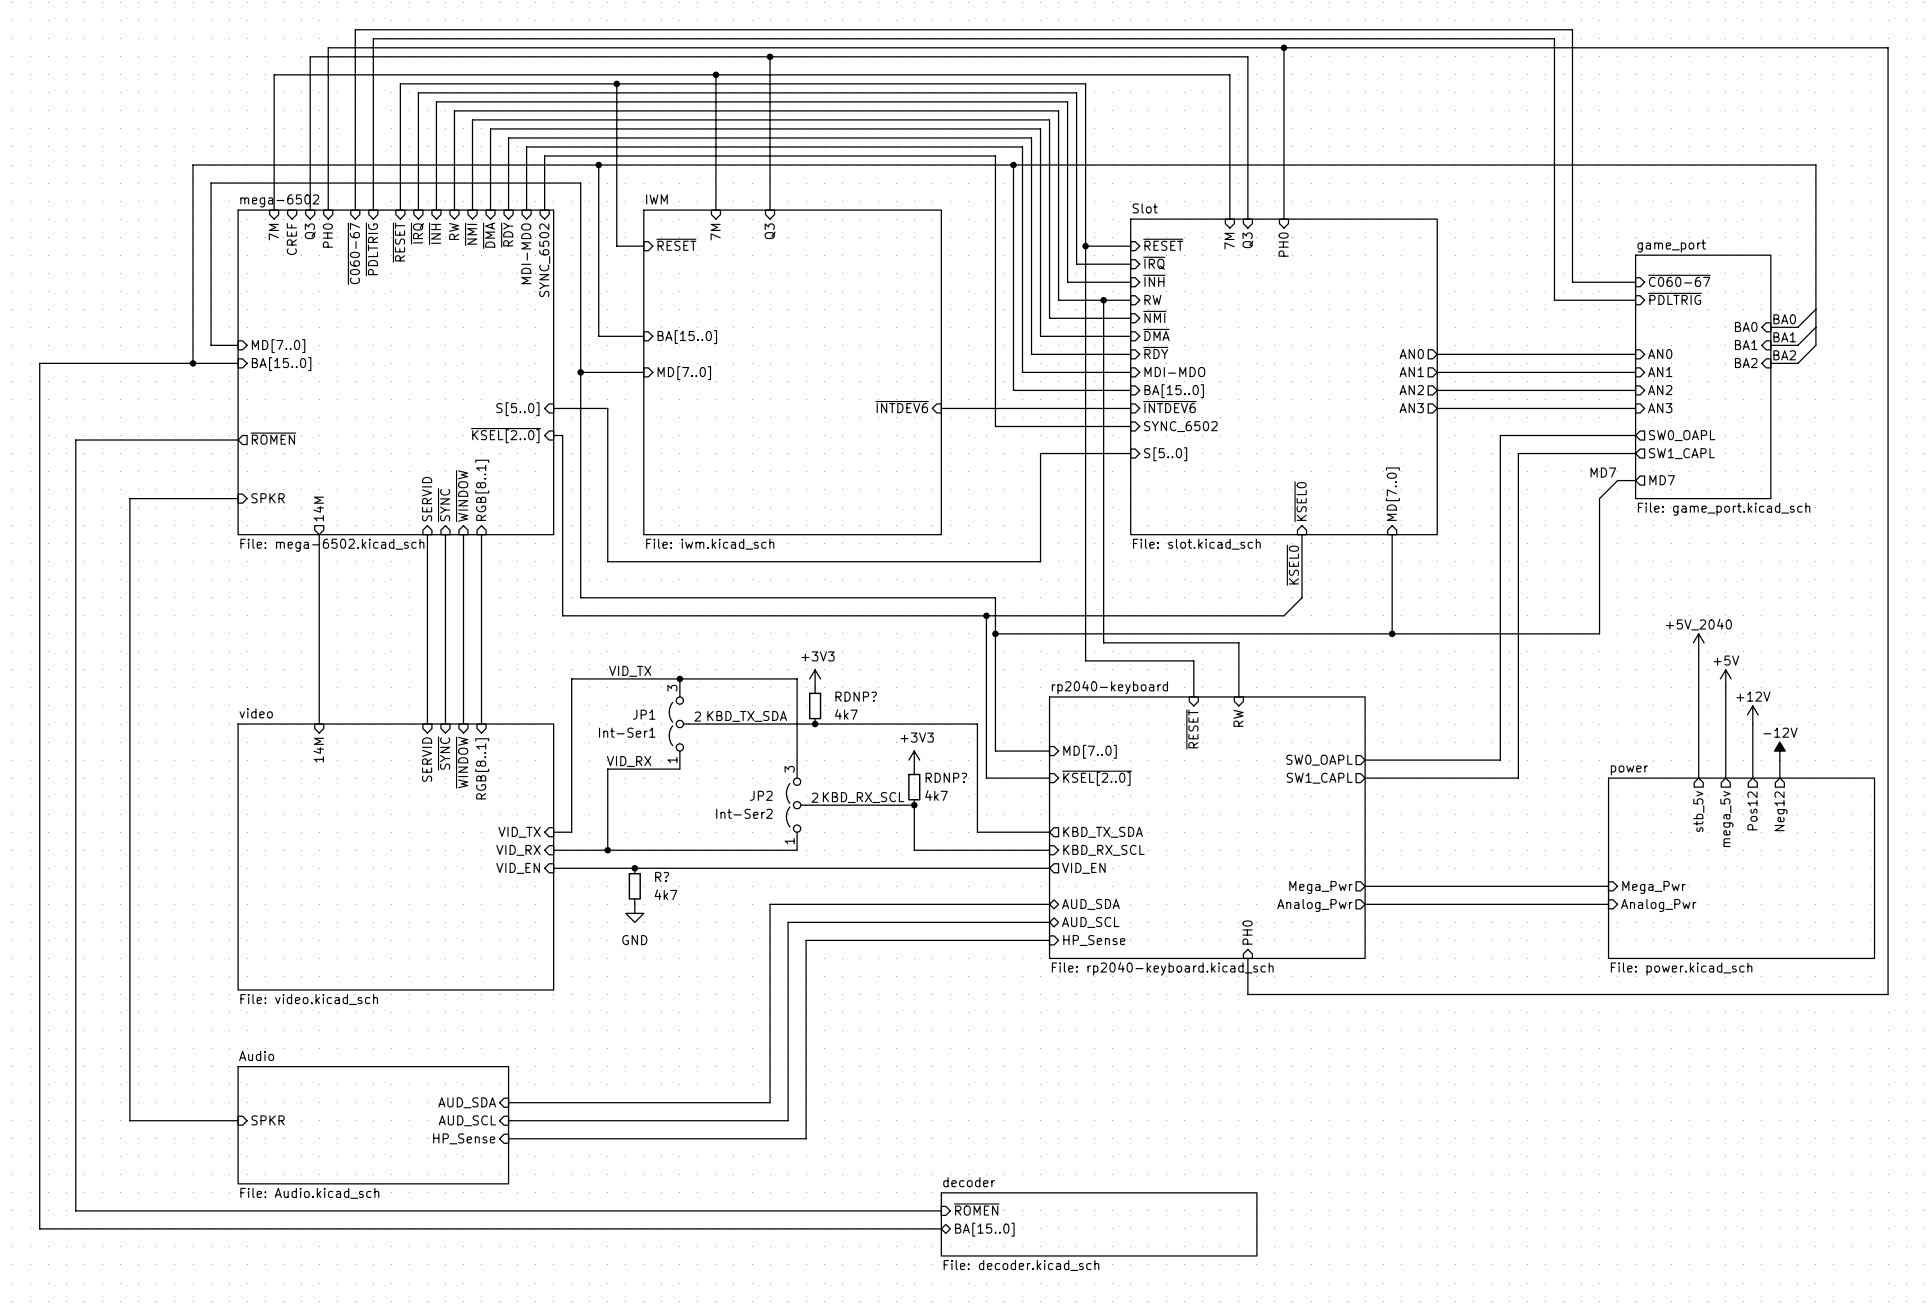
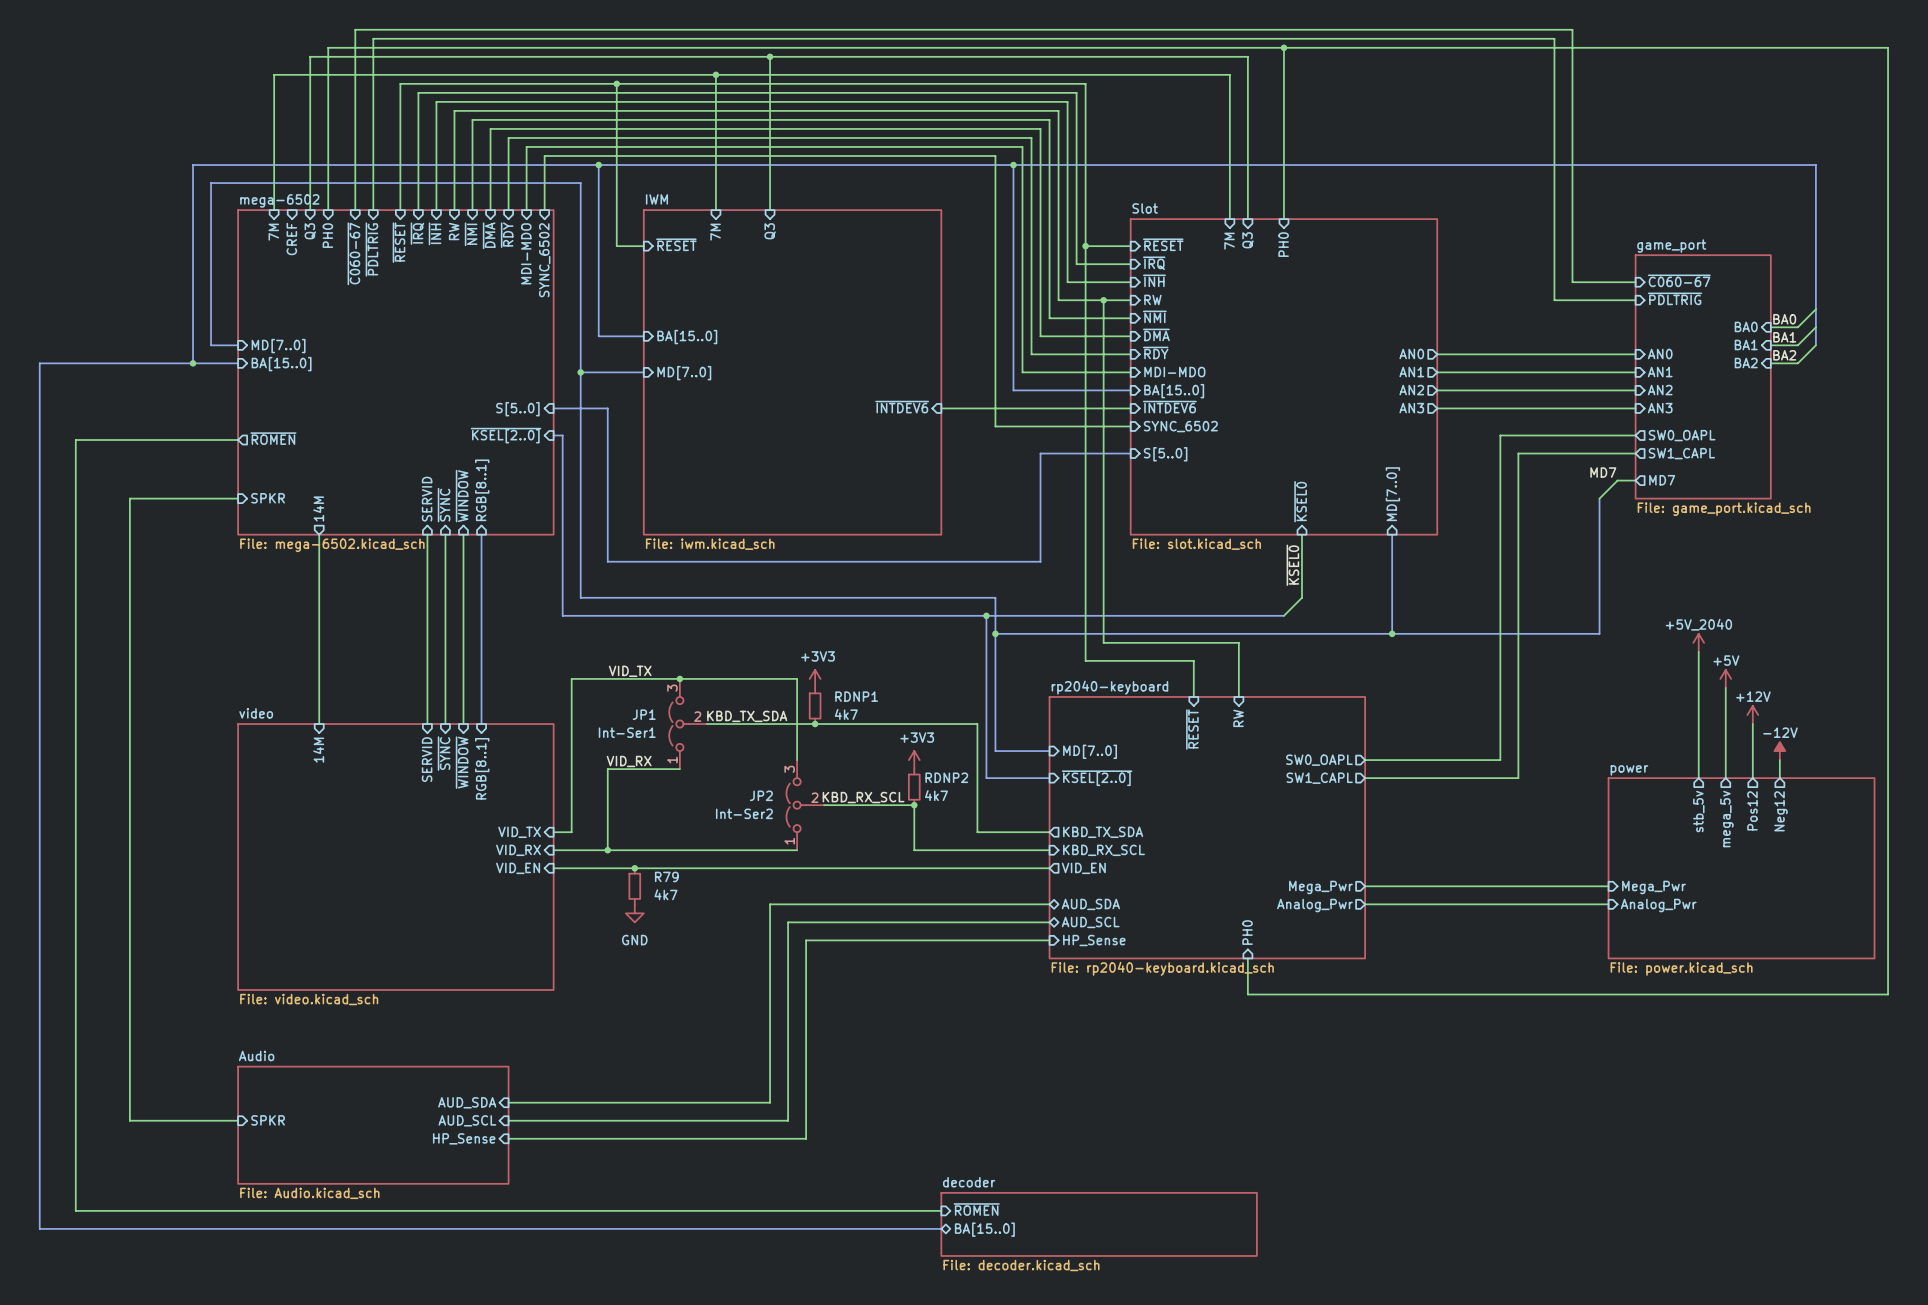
RDNP? name: RDNP? (856, 696) -> RDNP1 (856, 696)
RDNP? name: RDNP? (946, 777) -> RDNP2 (946, 777)
R? name: R? (662, 876) -> R79 (666, 876)

